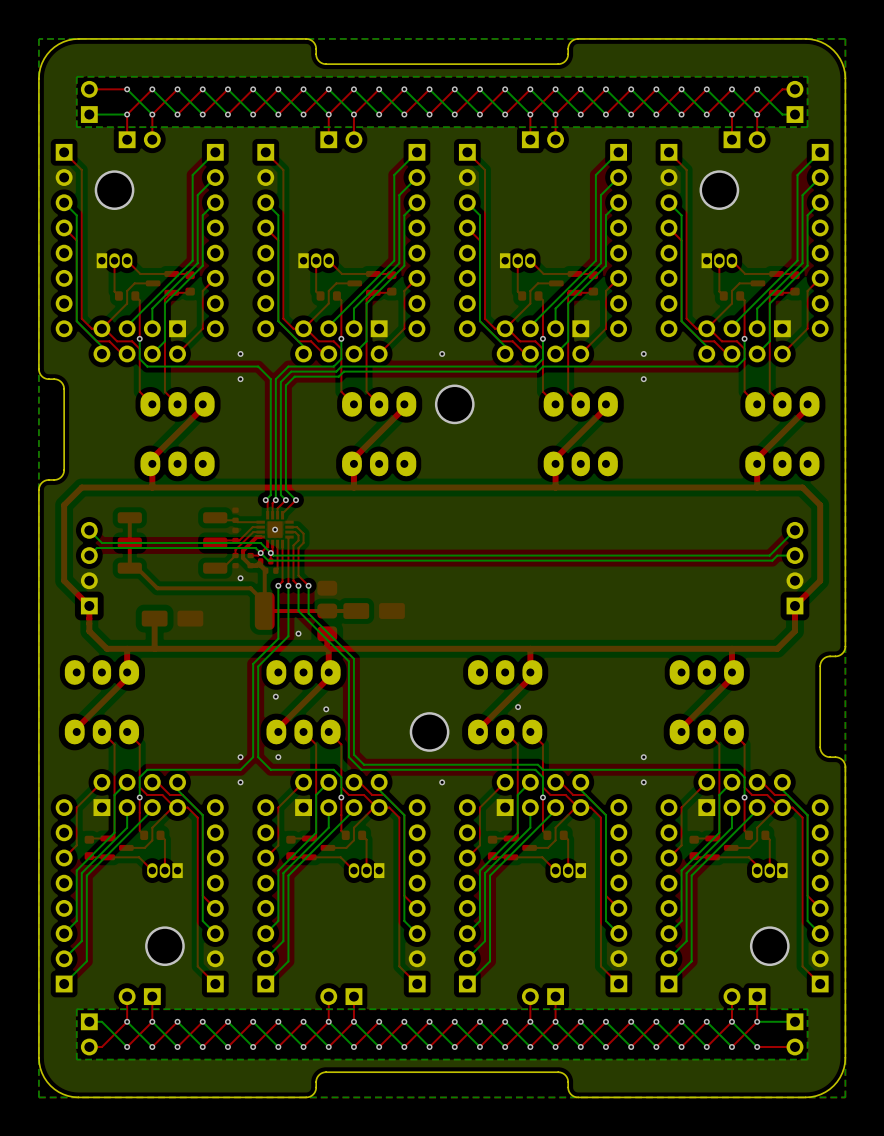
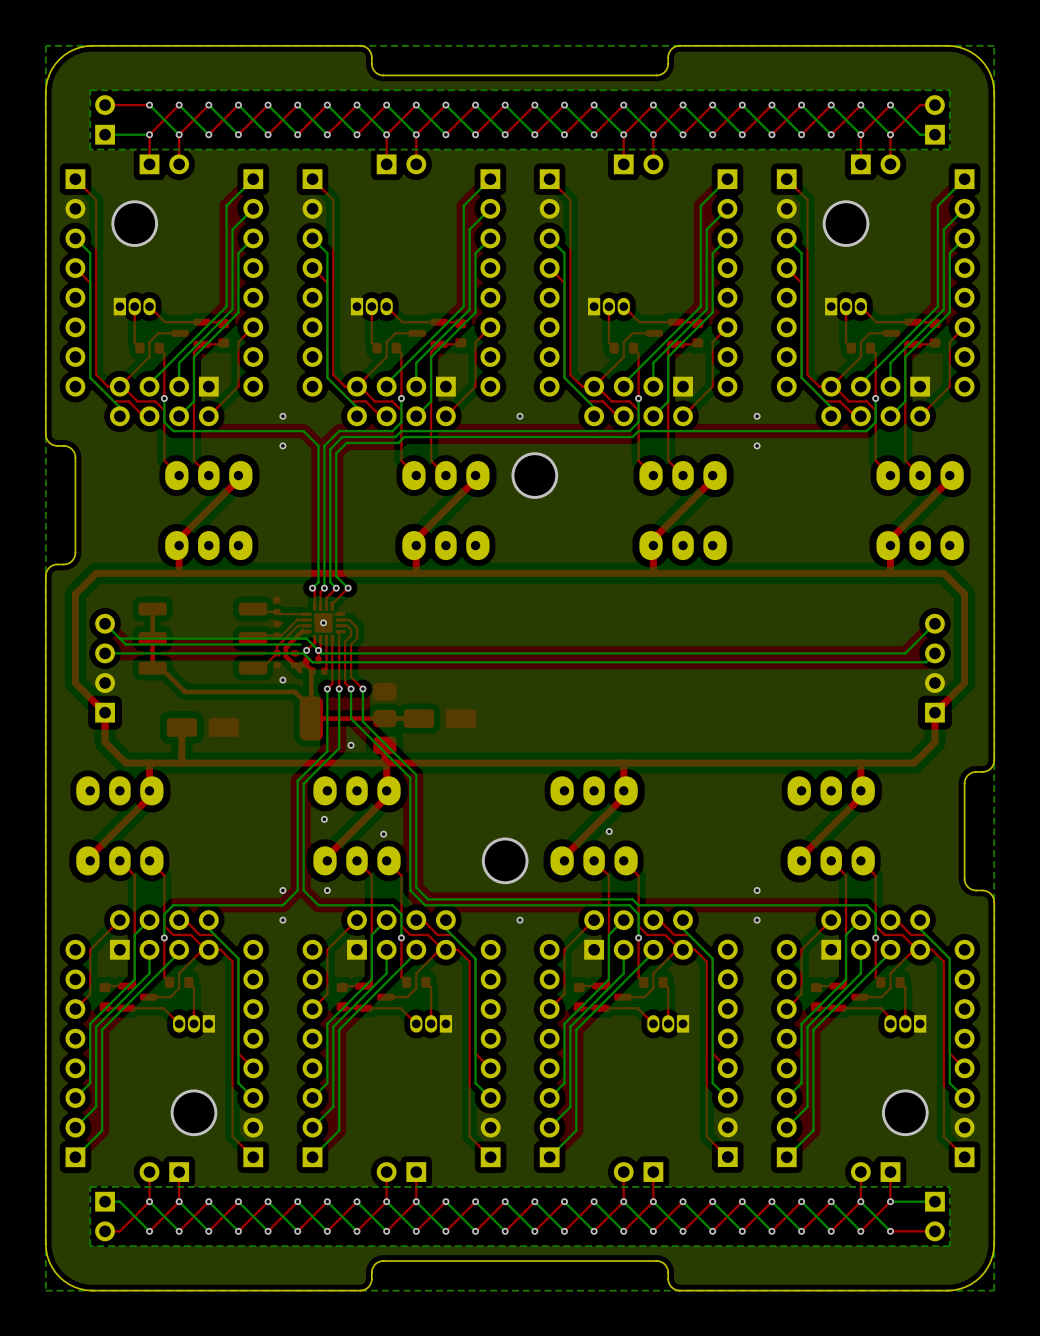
bottom track: (106, 548) (96, 548) (89, 555) -> (125, 644) (119, 638)
bottom track: (255, 548) (268, 560) (772, 560) (777, 555) (794, 555) -> (105, 653) (303, 653) (312, 662) (926, 662) (934, 653)

